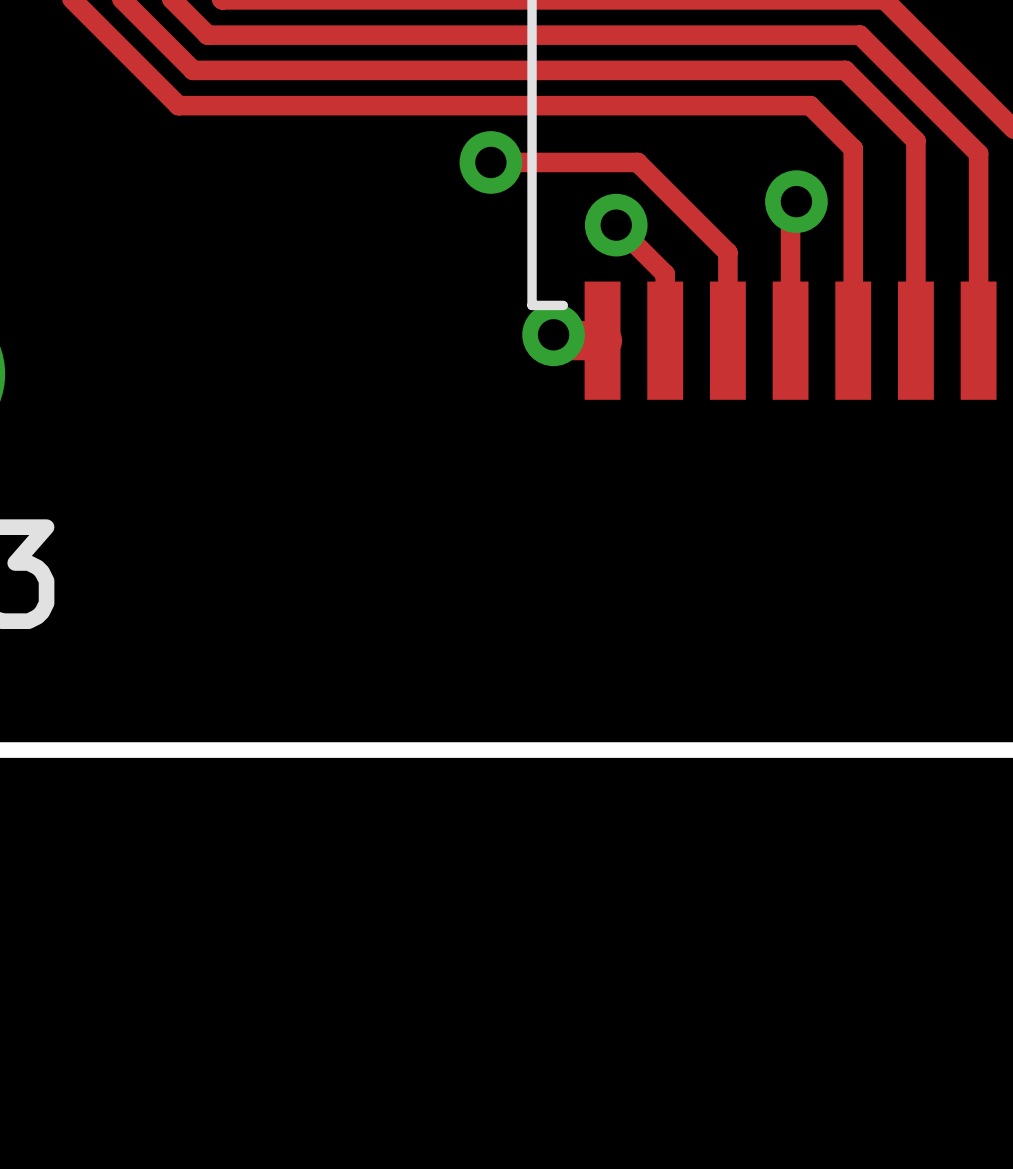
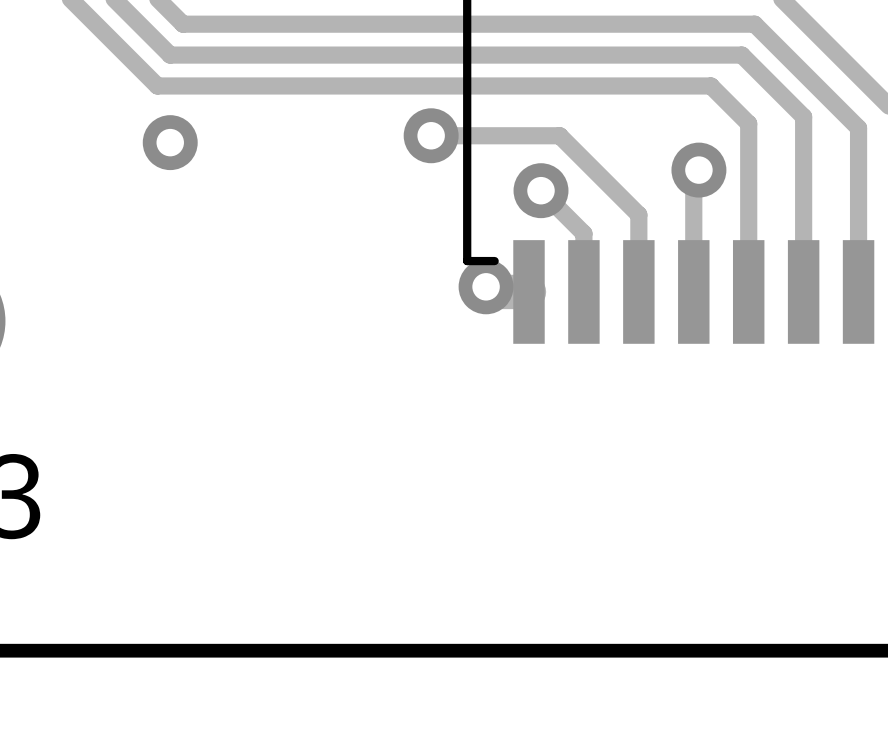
via: none -> (170, 142)

